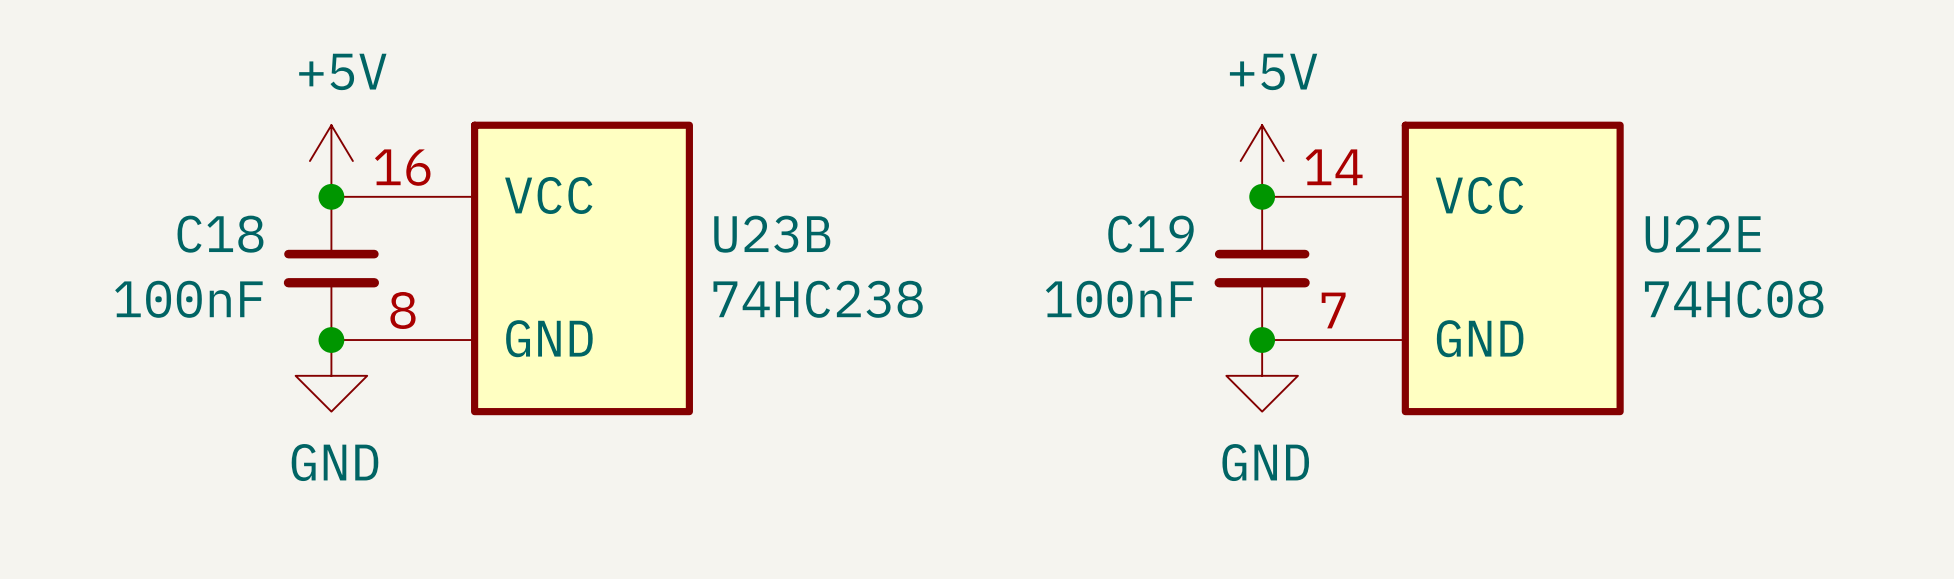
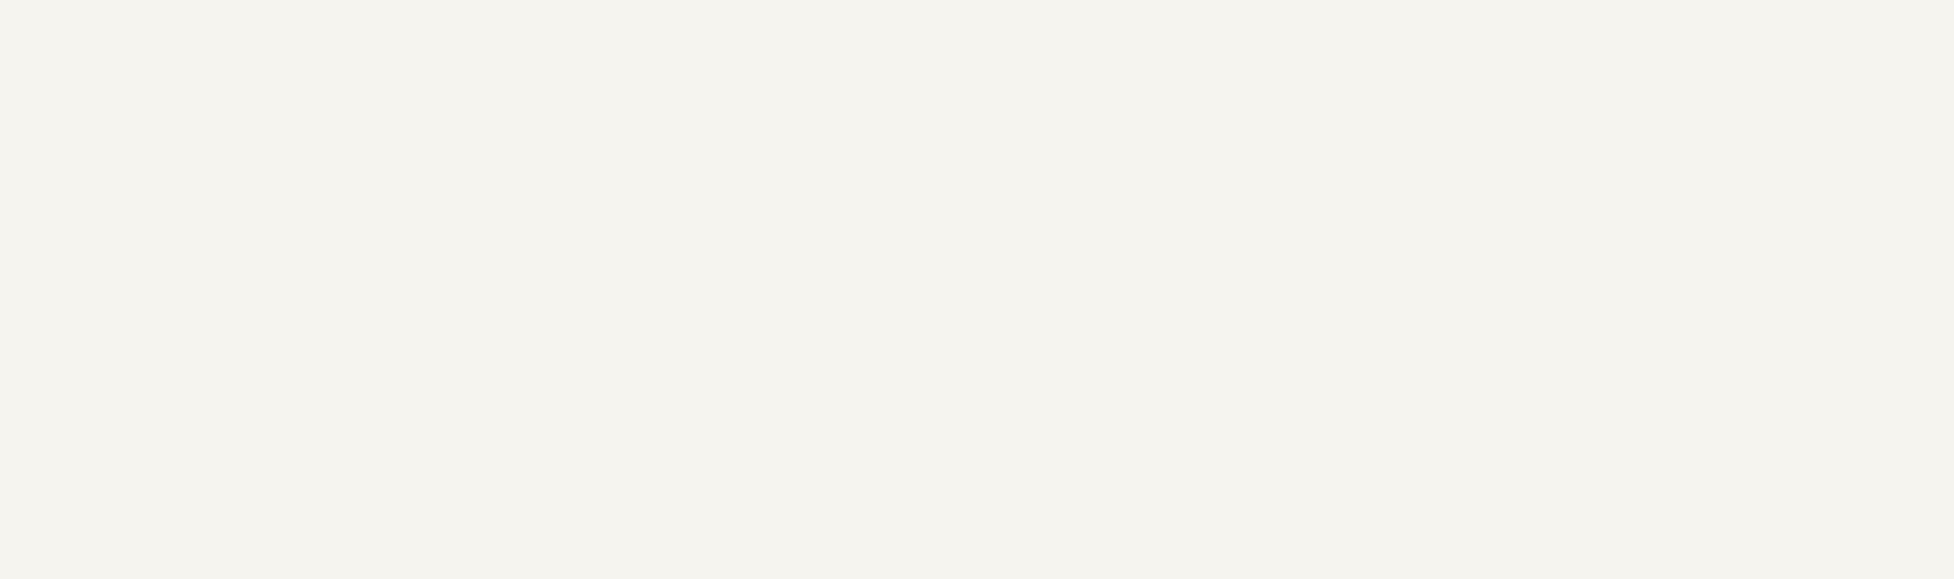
power symbol: +5V (331, 161) -> none
power symbol: +5V (1262, 161) -> none
junction: (331, 196) -> none
junction: (1262, 196) -> none
C18: 100nF (331, 268) -> none
U23B: 74HC238 (512, 268) -> none
C19: 100nF (1262, 268) -> none
U22E: 74HC08 (1442, 268) -> none
junction: (331, 340) -> none
junction: (1262, 340) -> none
power symbol: GND (331, 375) -> none
power symbol: GND (1262, 375) -> none

